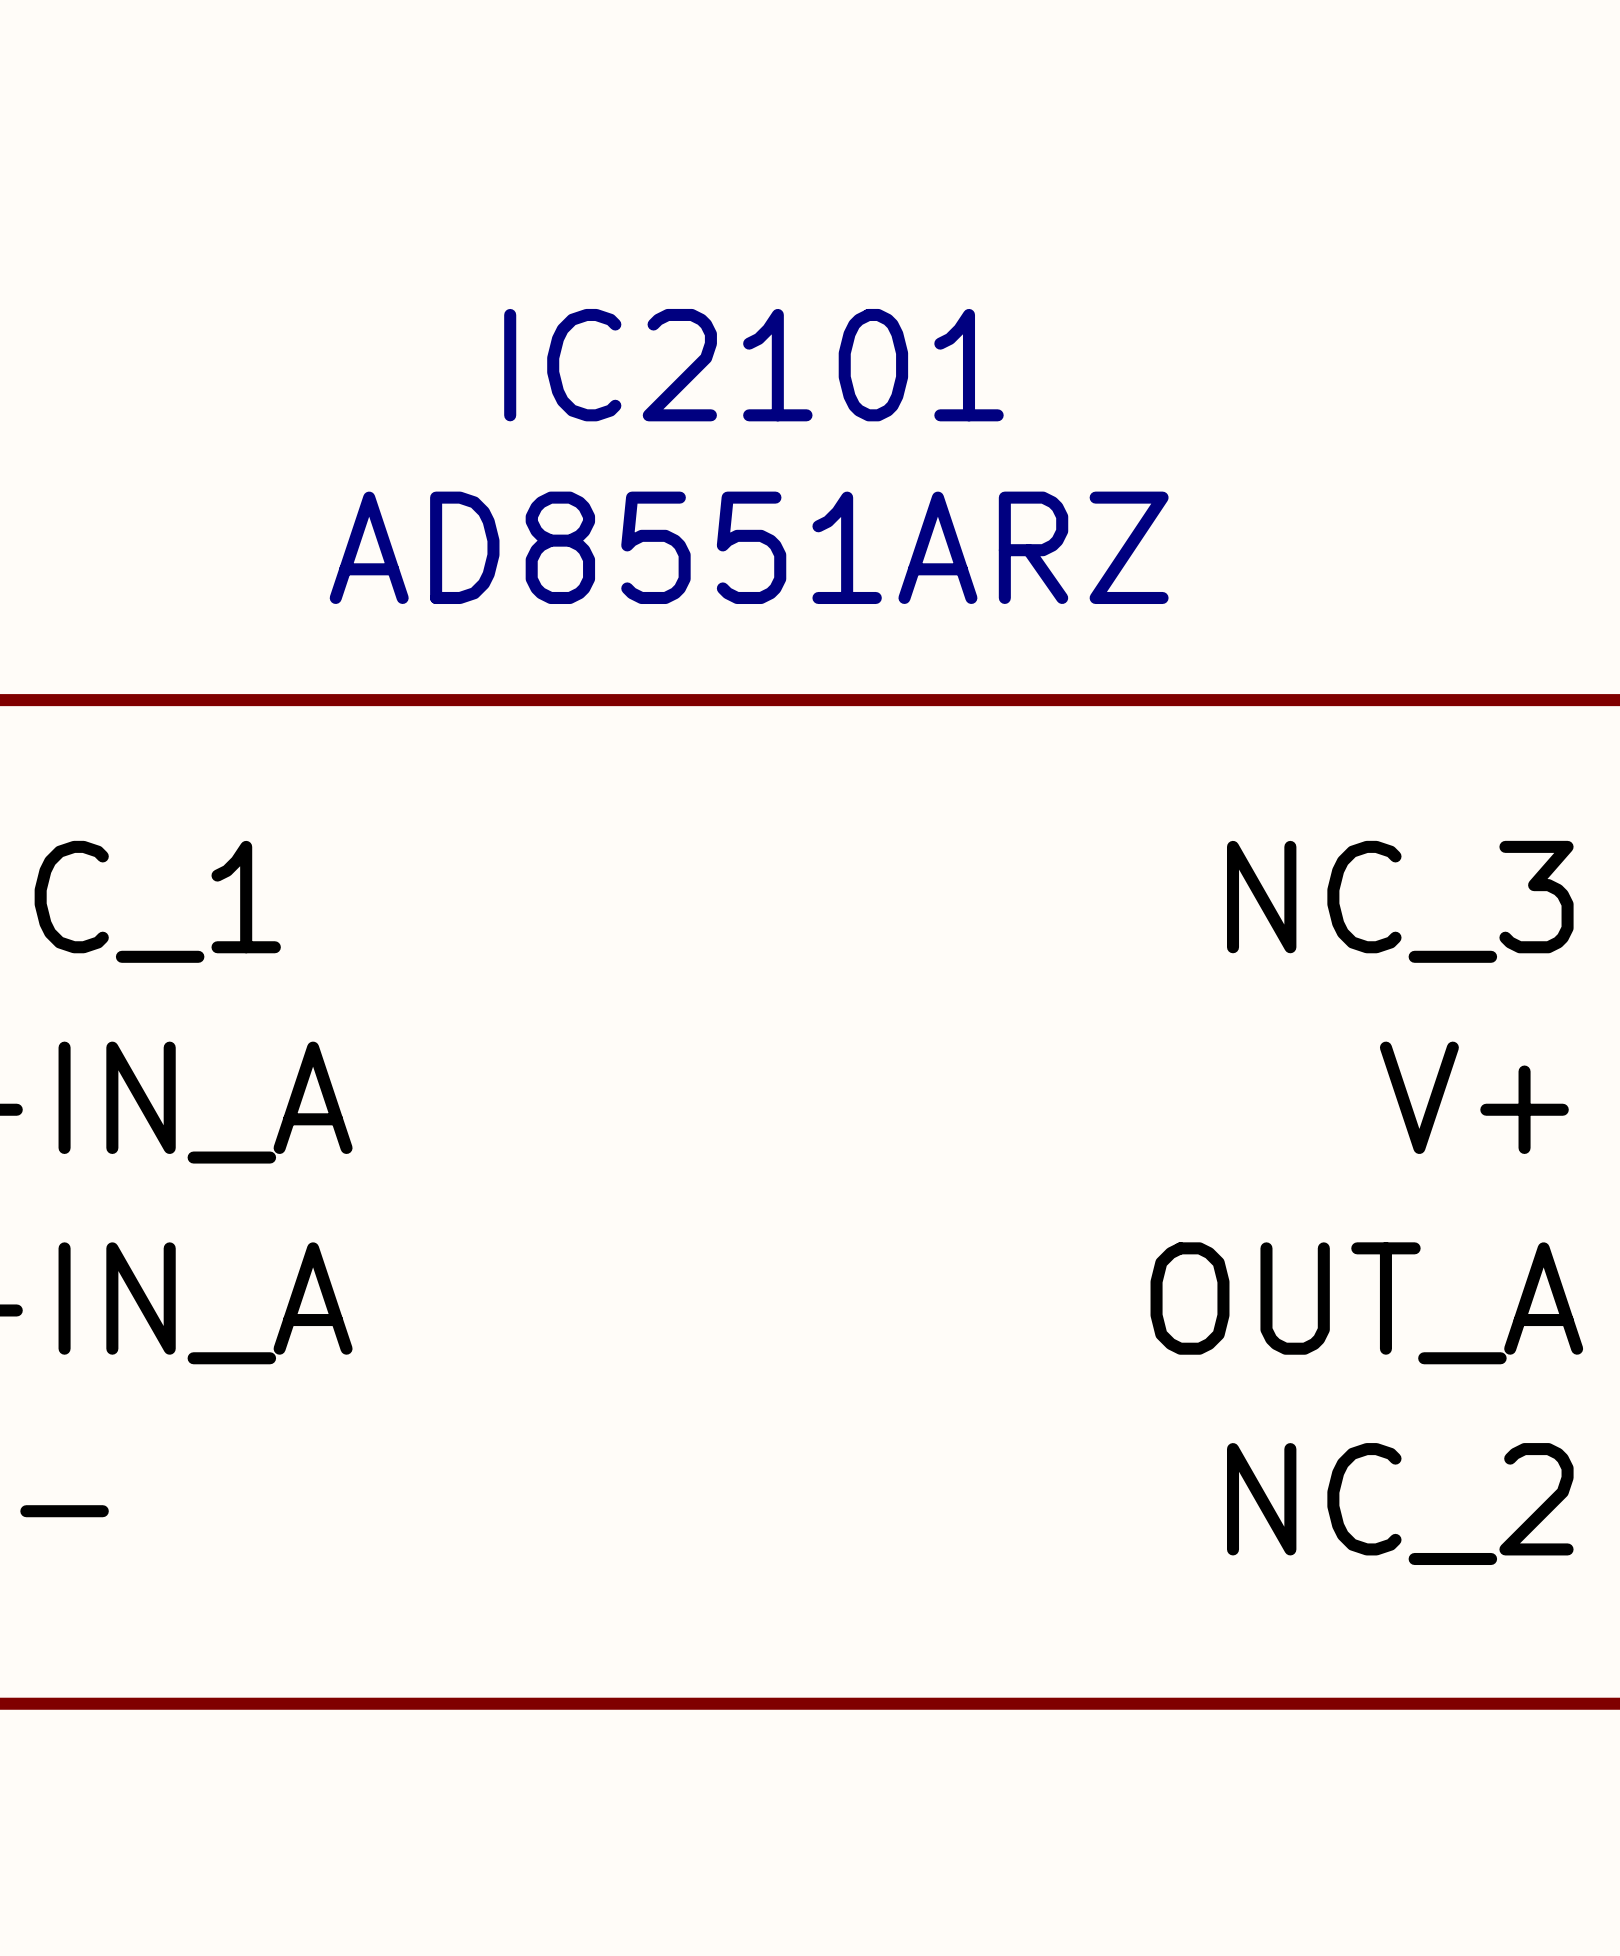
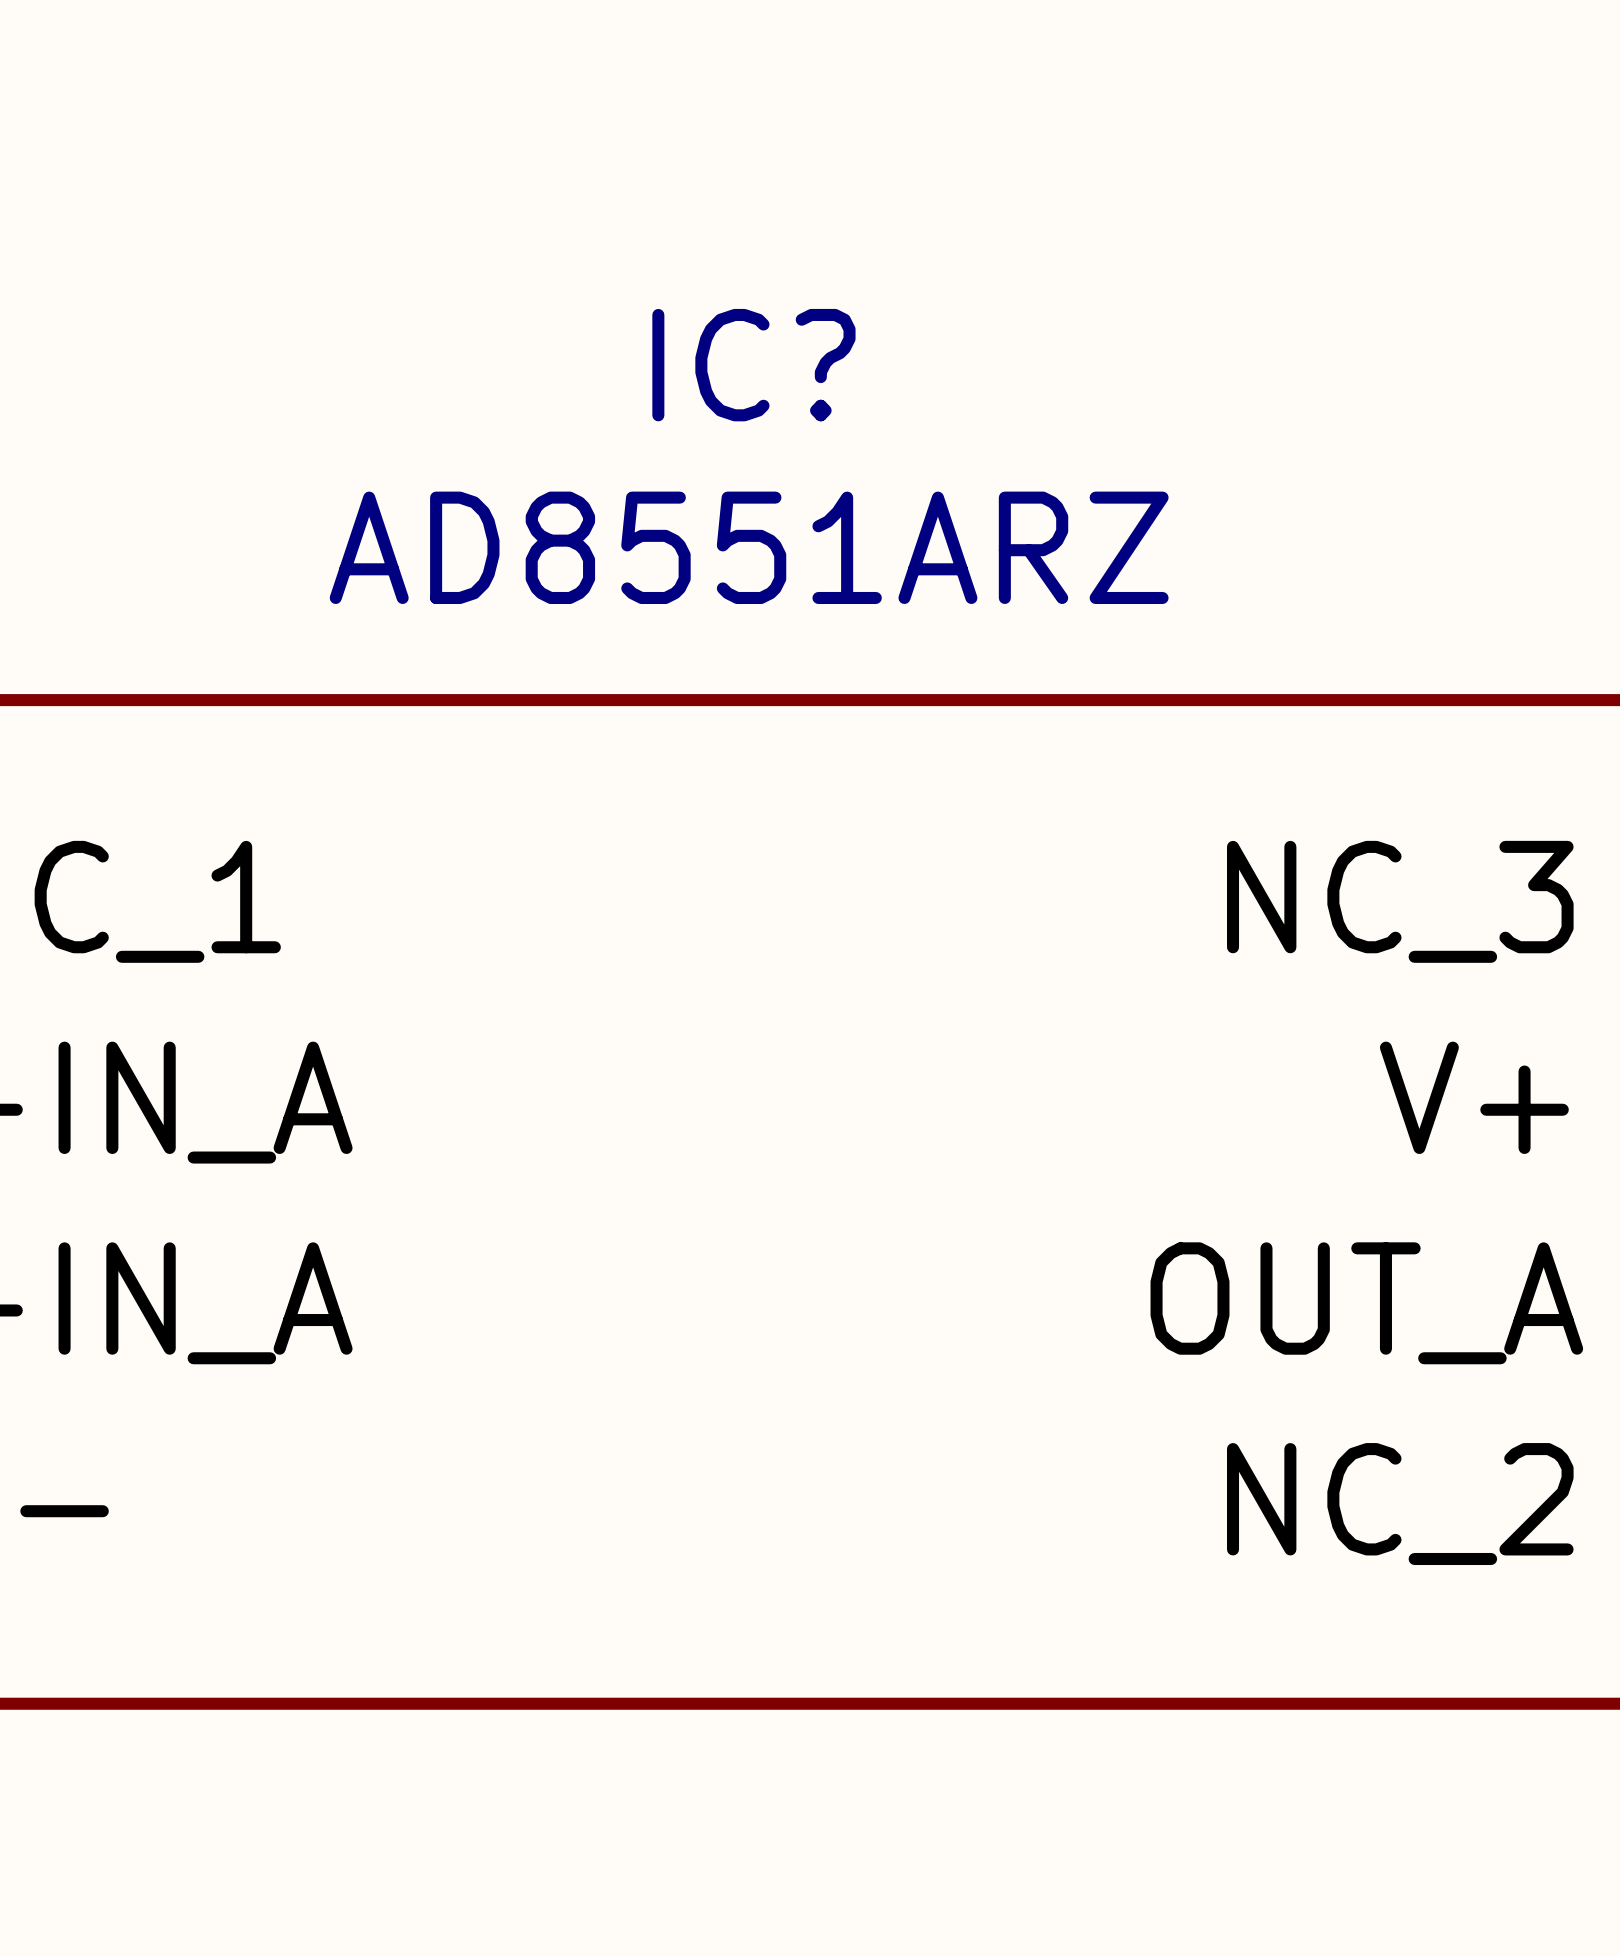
IC2101 name: IC2101 (753, 365) -> IC? (753, 365)

